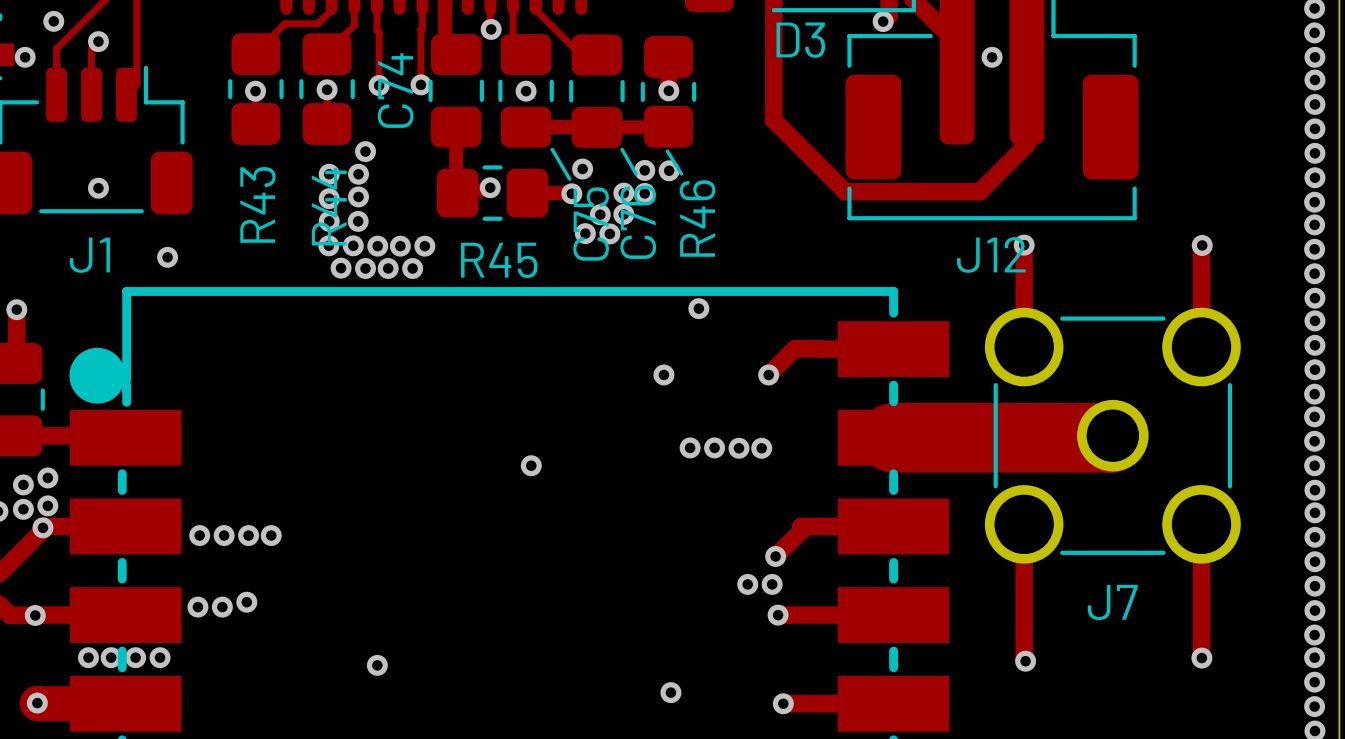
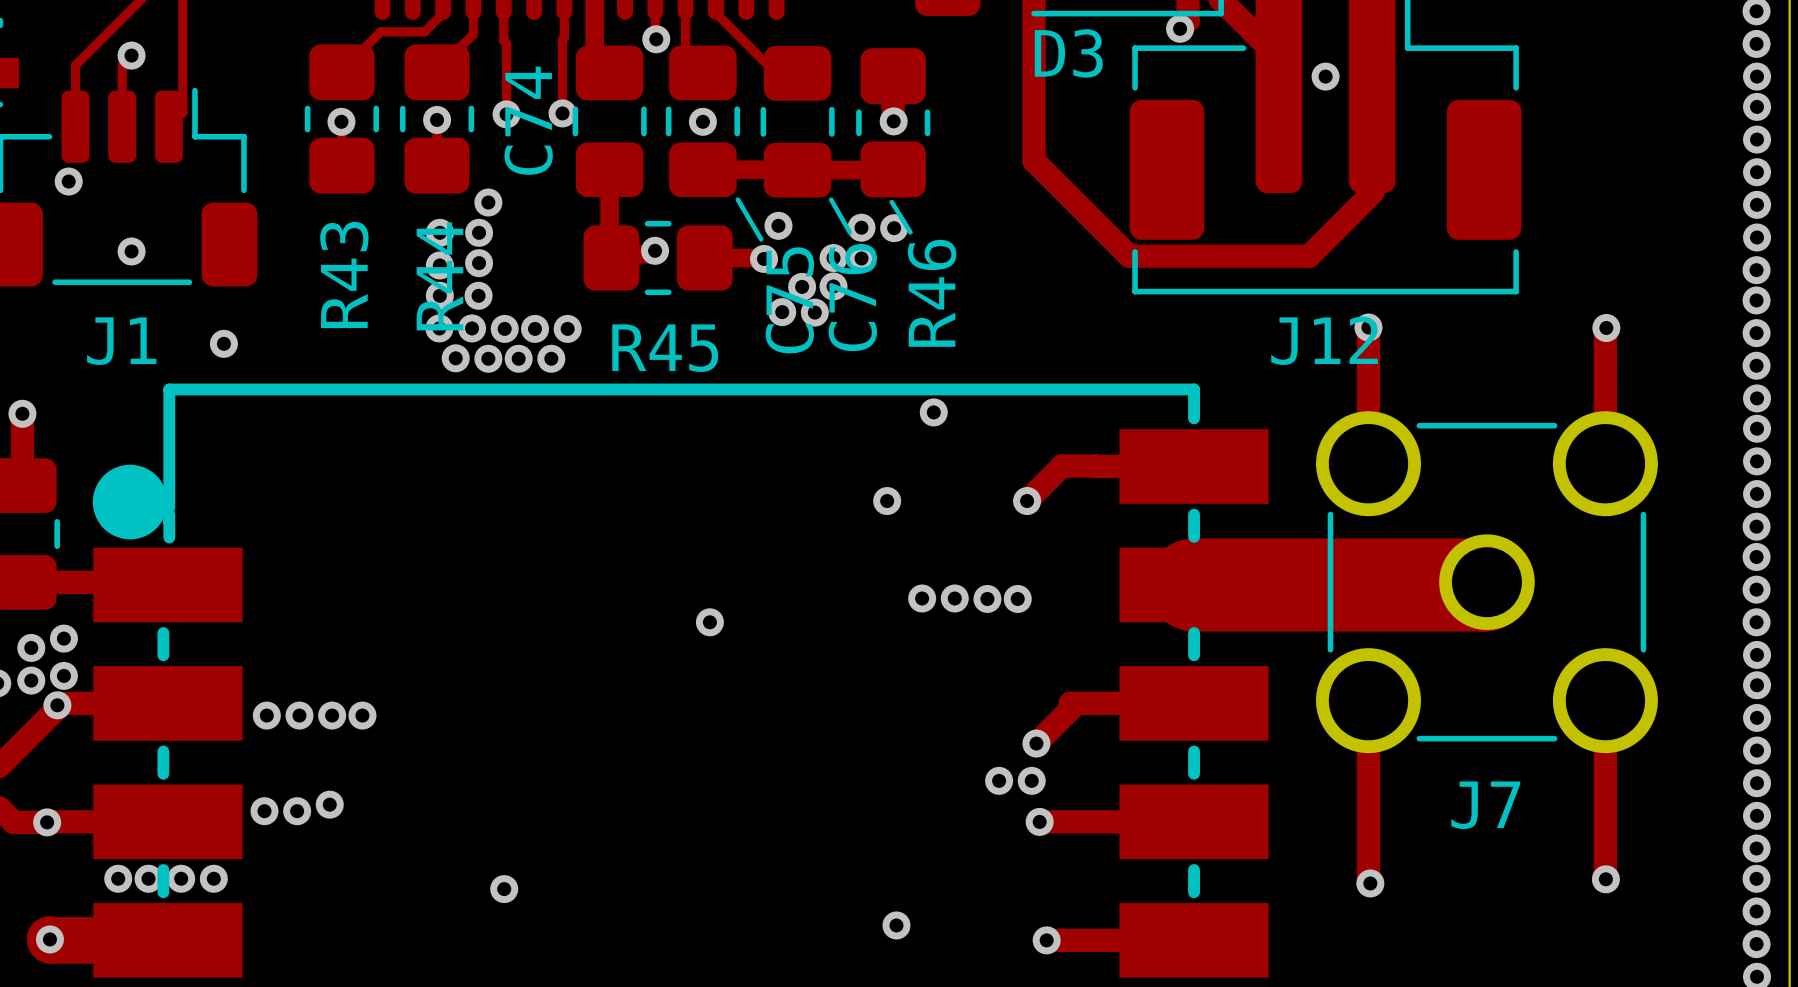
via: (53, 21) -> none
via: (25, 57) -> none
via: none -> (68, 181)

